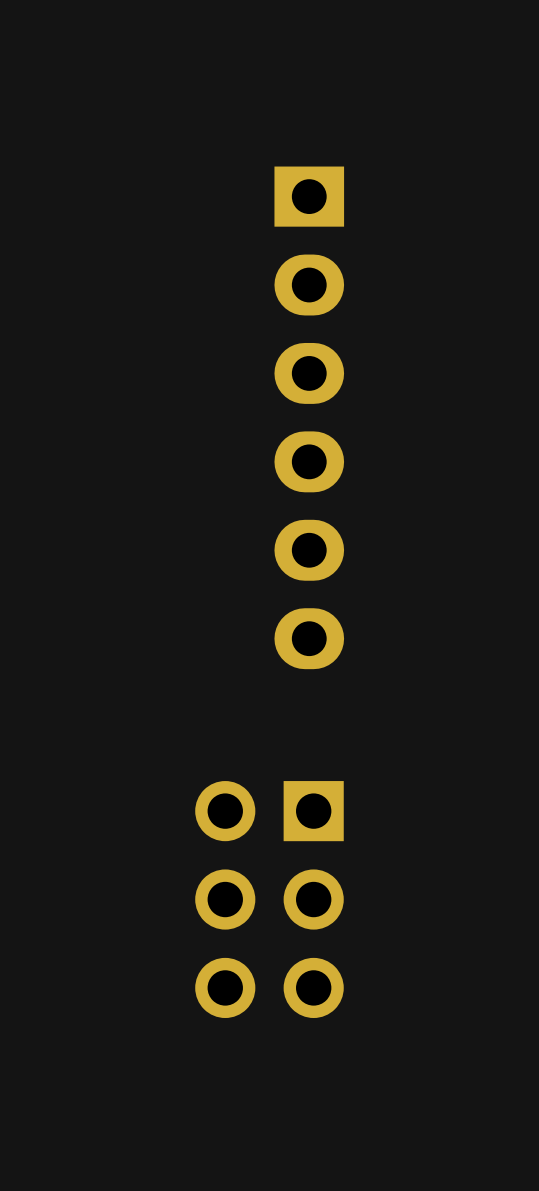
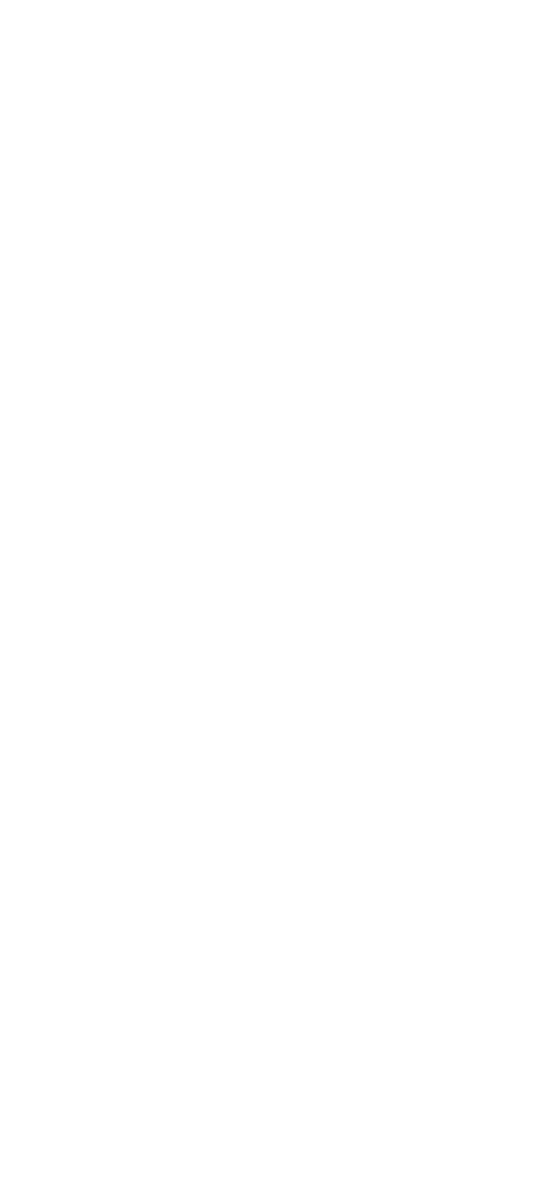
part: (309, 417) -> none
part: (269, 899) -> none

